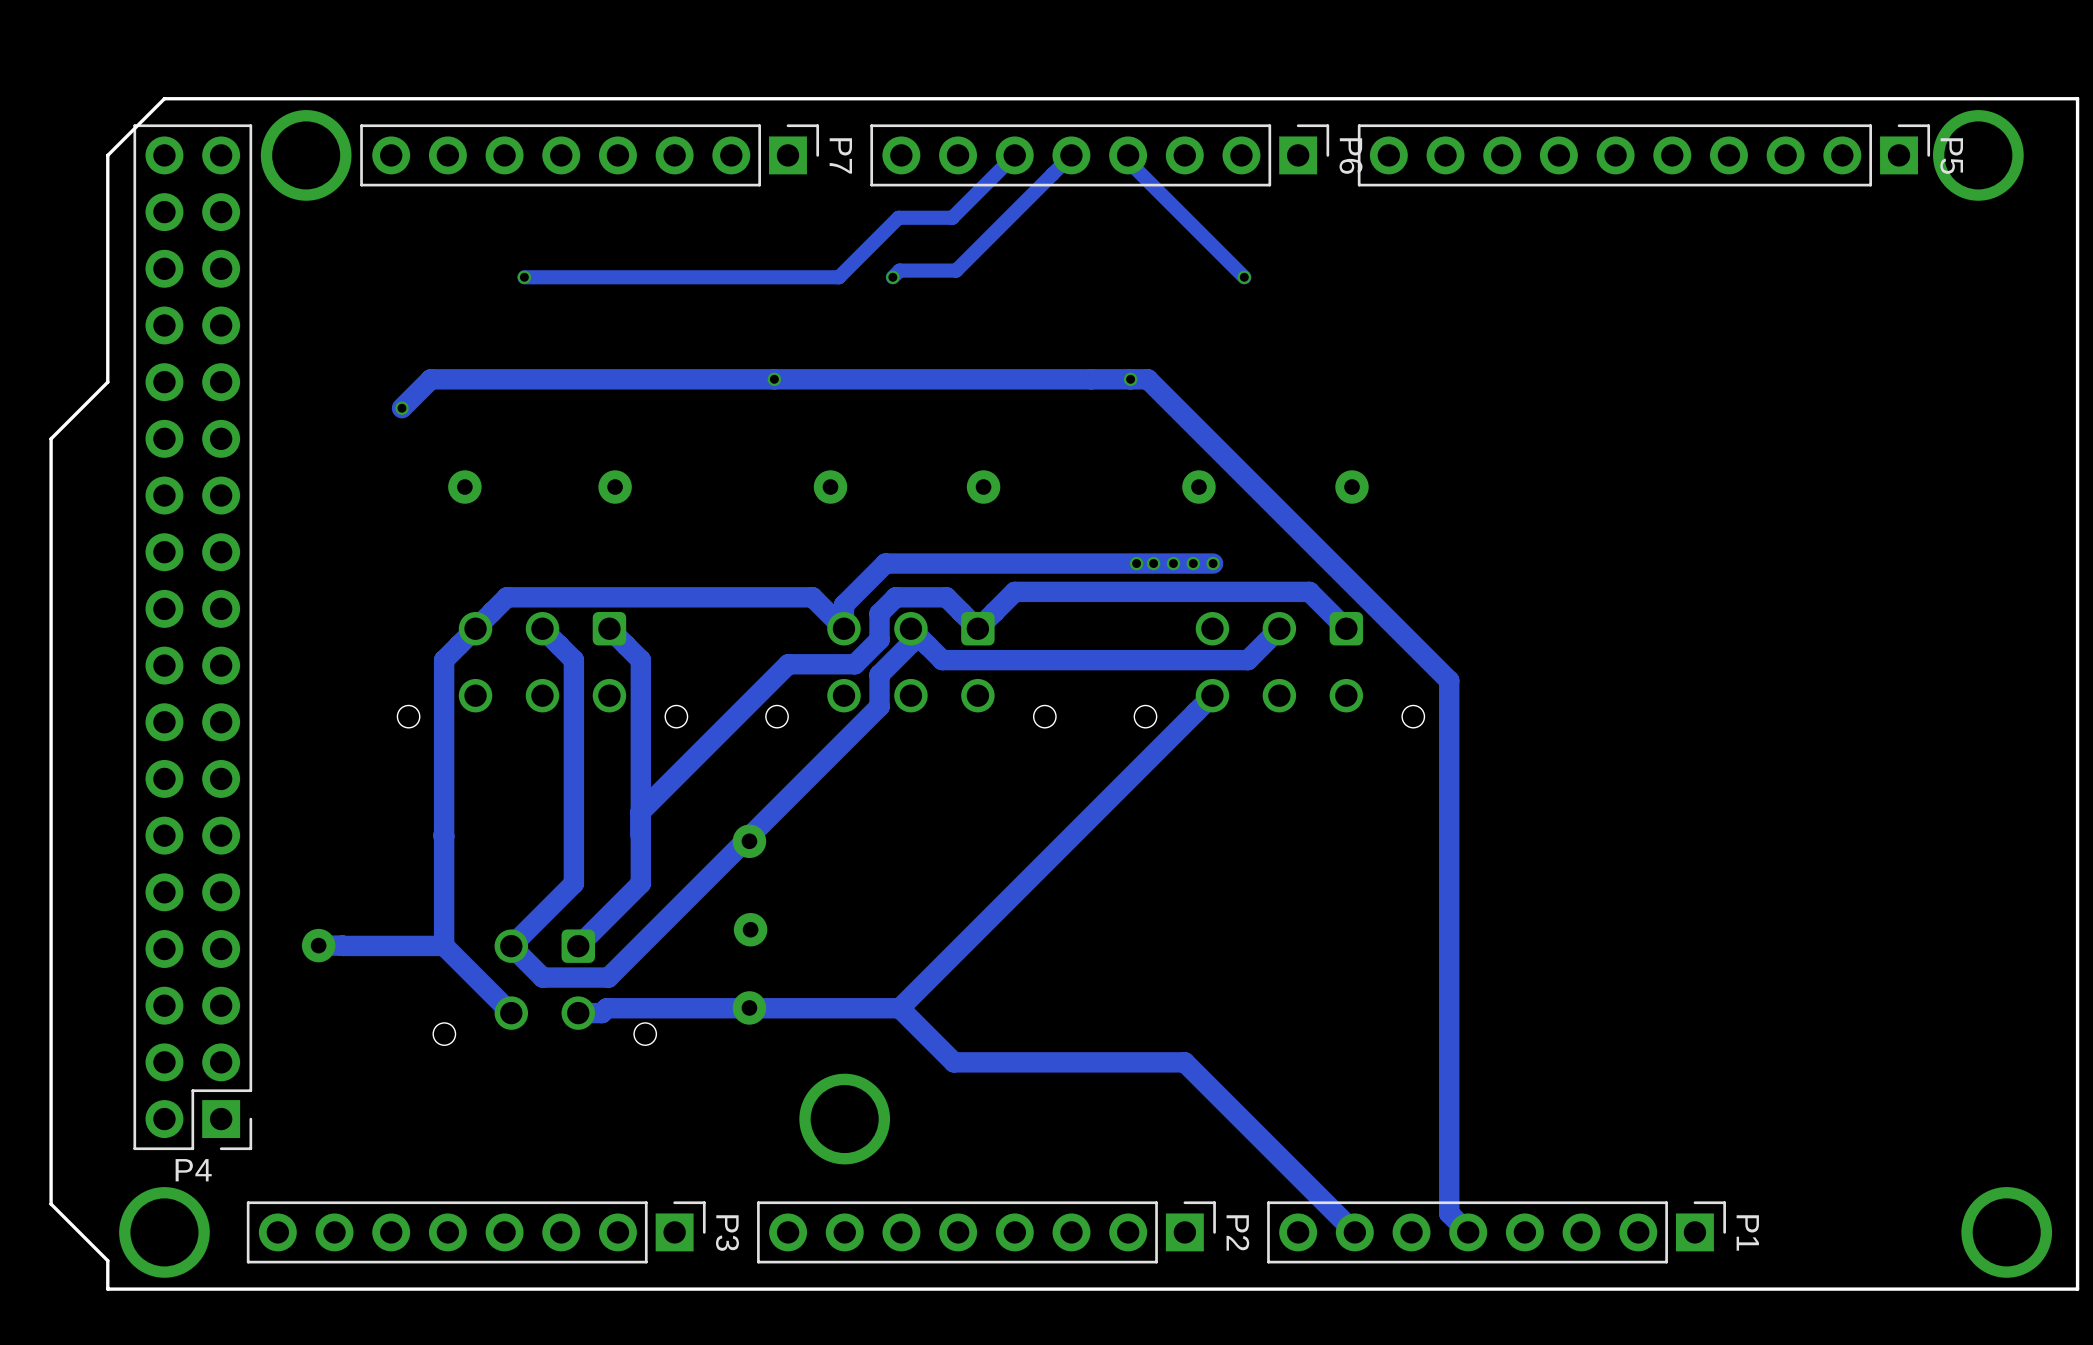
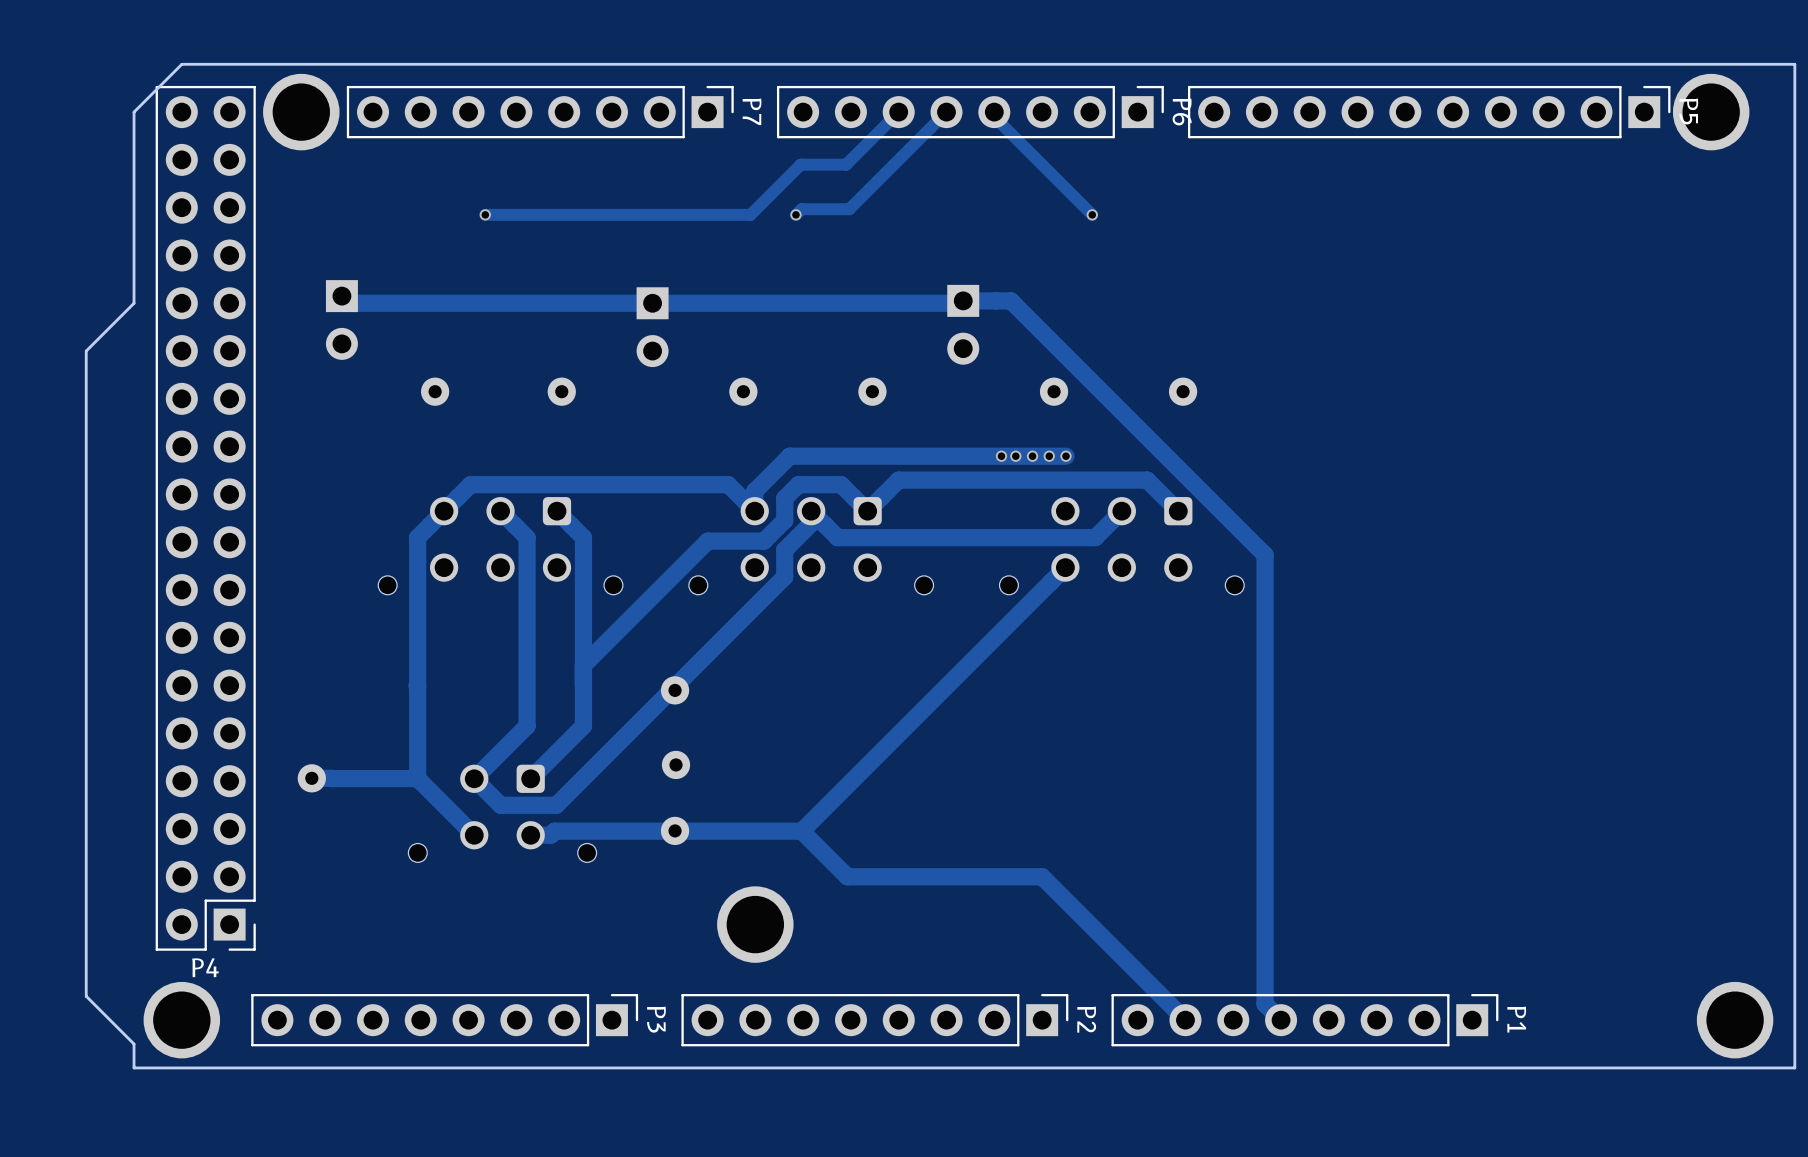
via: (774, 379) -> none
track: (1091, 379) (430, 379) (401, 408) -> (963, 300) (960, 303) (349, 303) (341, 296)
via: (1130, 379) -> none
part: none -> (341, 320)
part: none -> (963, 324)
via: (401, 408) -> none
part: none -> (652, 327)

